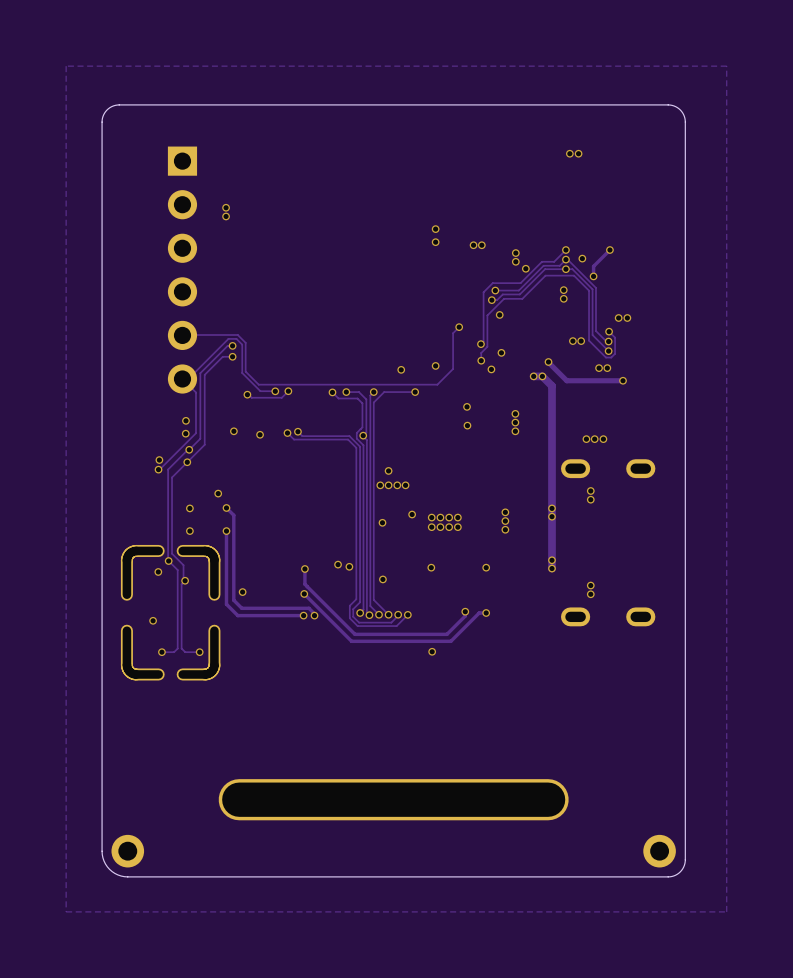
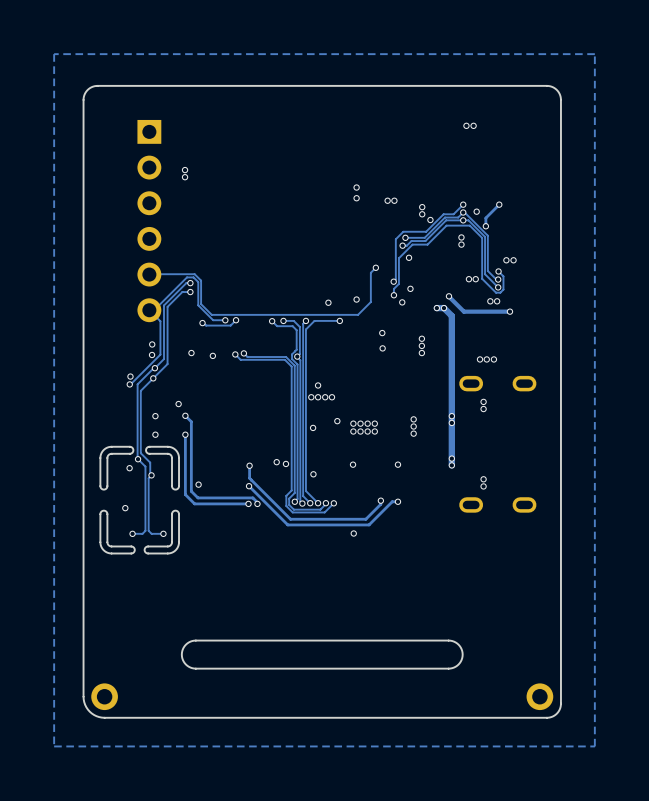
board edge: none -> (129, 446) (108, 447) (101, 452) (100, 486) (102, 489) (105, 489) (107, 486) (107, 455) (111, 453) (131, 453) (133, 449) (129, 446)
board edge: none -> (167, 446) (148, 446) (146, 451) (149, 453) (171, 455) (172, 486) (176, 489) (178, 486) (178, 455) (174, 449) (167, 446)
part: (170, 612) -> none
board edge: none -> (107, 514) (108, 544) (132, 546) (134, 549) (133, 552) (110, 553) (102, 549) (100, 542) (100, 513) (103, 510) (107, 514)
board edge: none -> (179, 514) (178, 543) (176, 549) (169, 553) (145, 552) (144, 549) (147, 546) (171, 544) (172, 513) (175, 510) (179, 514)
board edge: none -> (448, 640) (195, 640) (185, 644) (181, 654) (185, 664) (195, 668) (448, 668) (458, 664) (462, 654) (458, 644) (448, 640)
part: (393, 799) -> none

